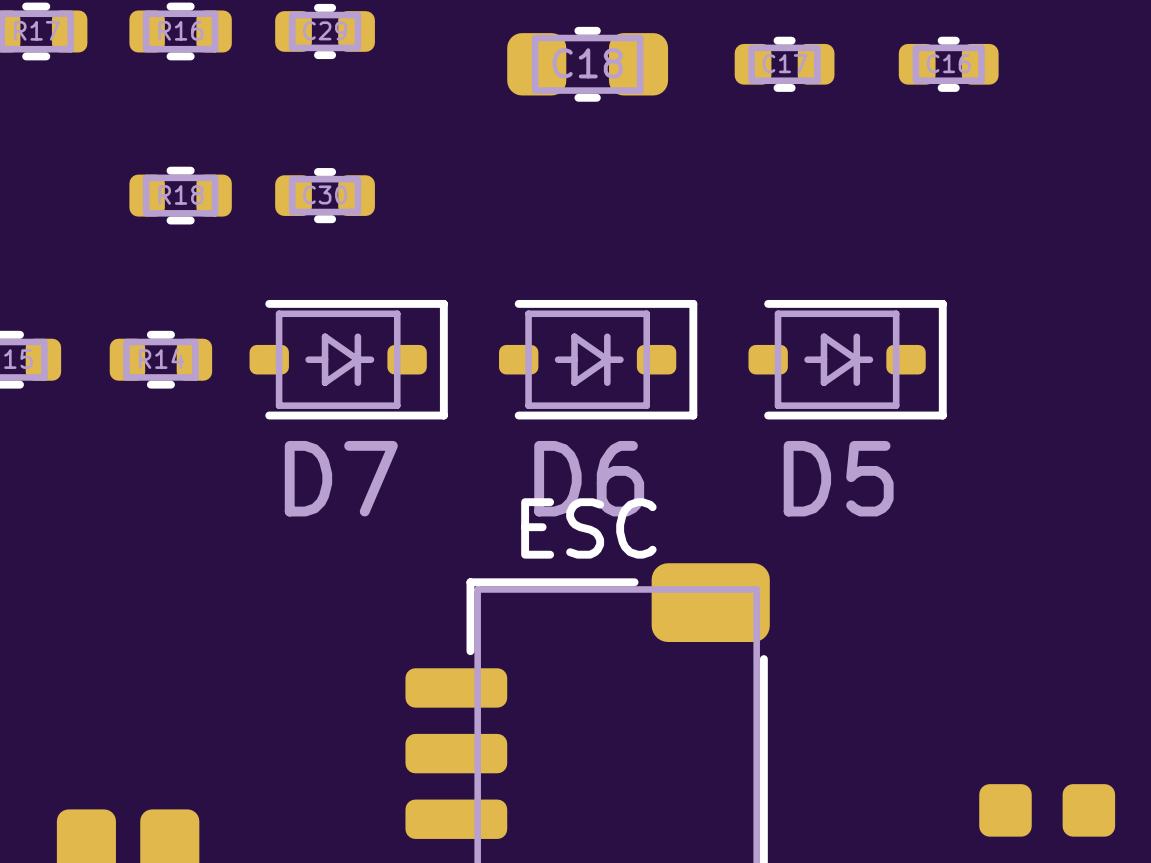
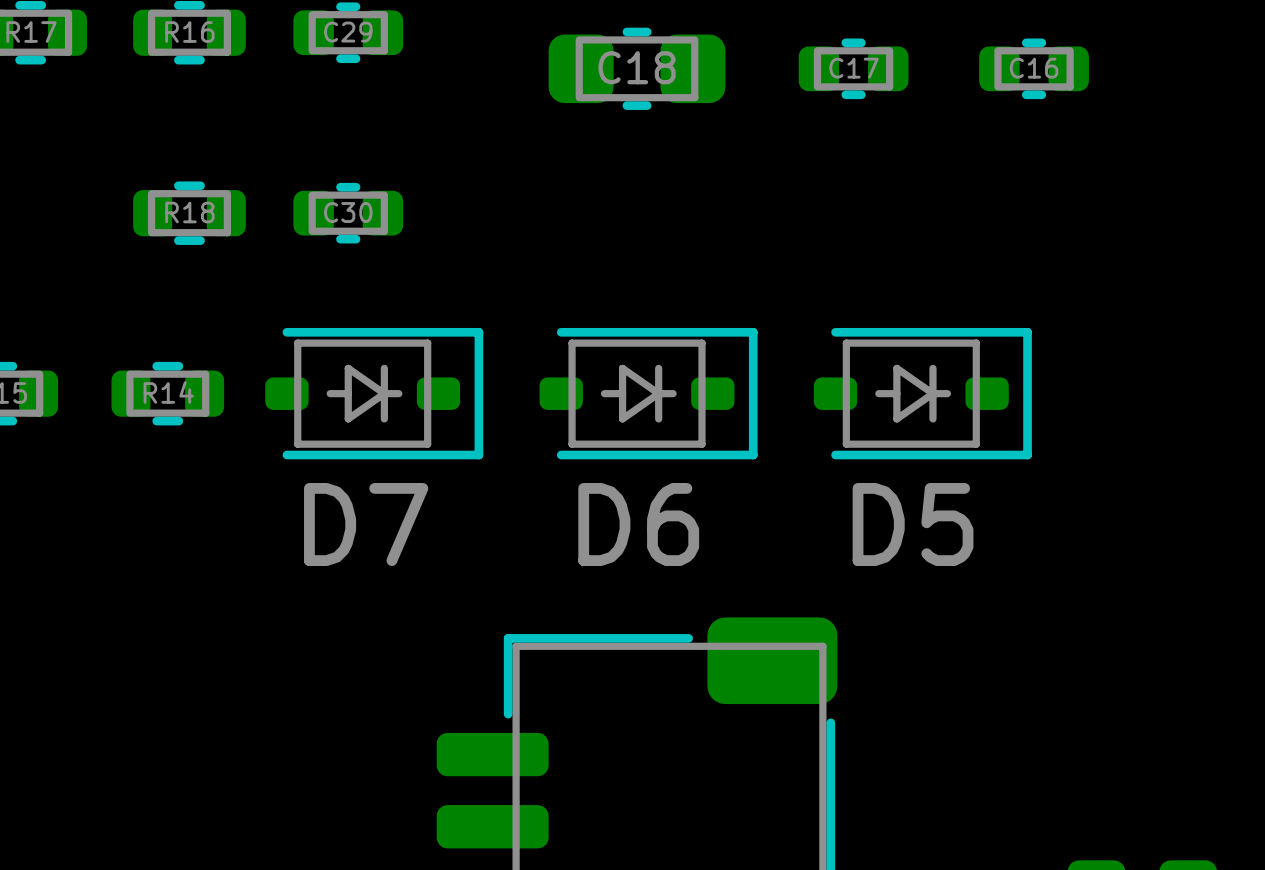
text: ESC (588, 528) -> none

